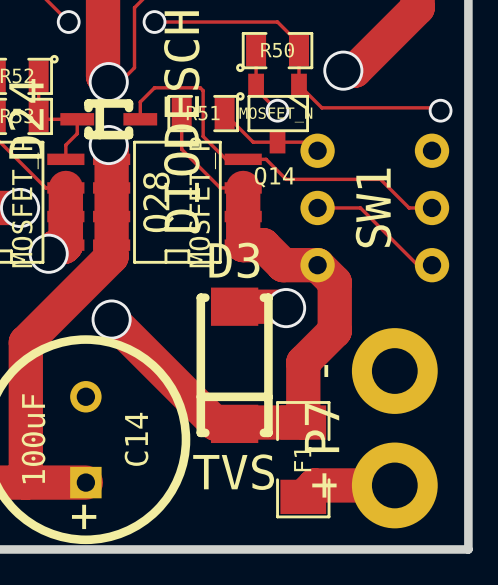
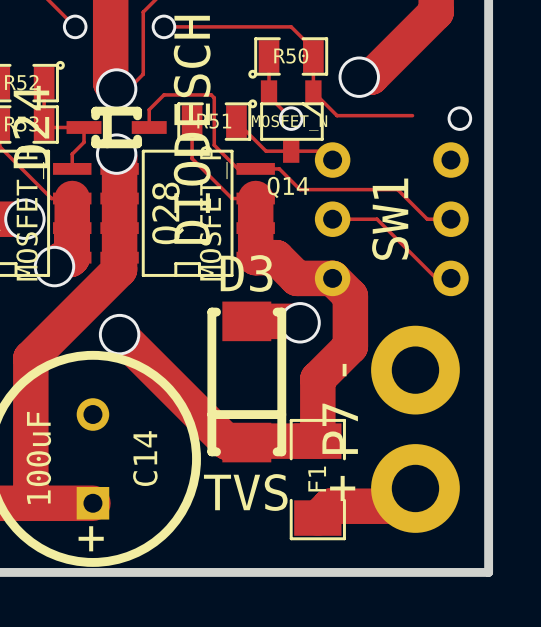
track: (394, 107) (437, 107) (440, 110) -> none
P7 position: (394, 428) -> (415, 429)

